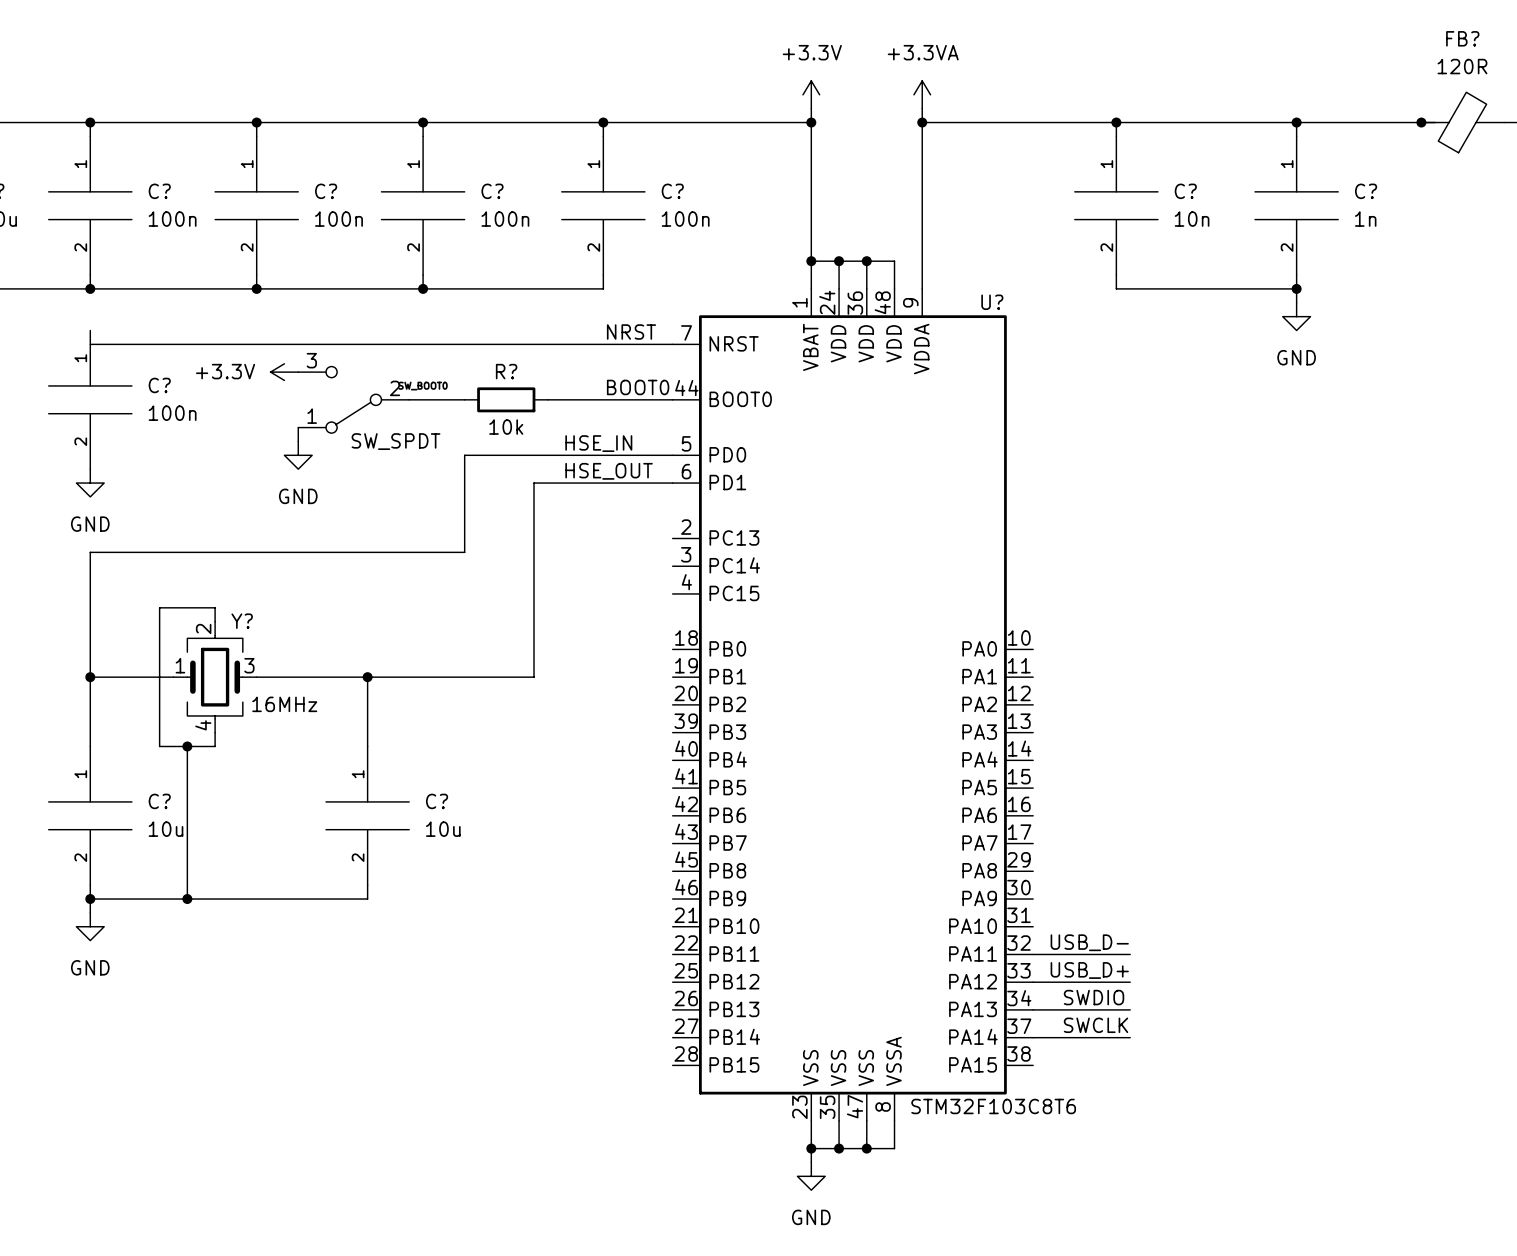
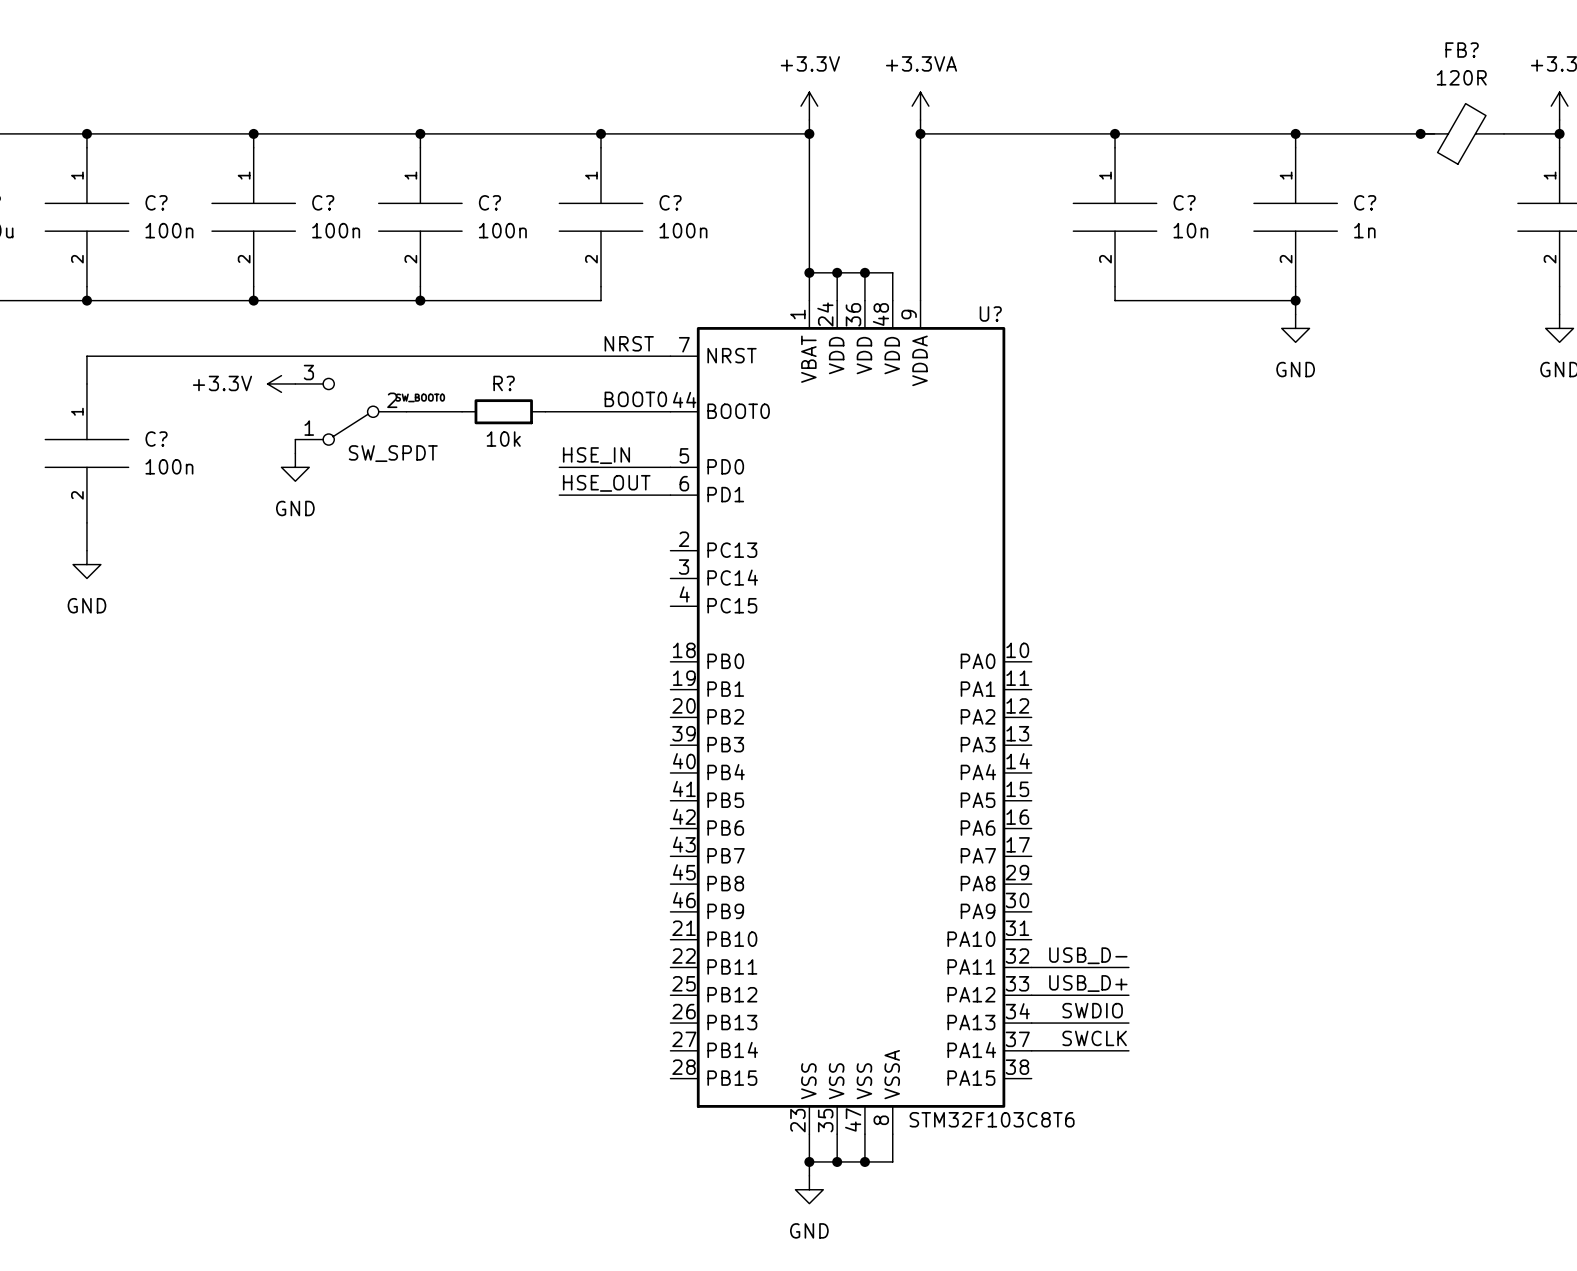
C? position: (90, 399) -> (86, 453)
wire: (561, 455) (464, 455) (464, 552) (90, 552) (90, 746) -> none
power symbol position: GND (90, 483) -> GND (86, 564)
wire: (561, 483) (534, 483) (534, 677) (256, 677) -> none
wire: none -> (86, 522) (86, 550)
wire: (215, 621) (215, 607) (159, 607) (159, 746) (215, 746) (215, 732) -> none
wire: (90, 677) (173, 677) -> none
junction: (90, 677) -> none
Y?: 16MHz (215, 677) -> none
wire: (367, 677) (367, 746) -> none
junction: (367, 677) -> none
wire: (187, 746) (187, 899) -> none
junction: (187, 746) -> none
C?: 10u (90, 815) -> none
C?: 10u (367, 815) -> none
wire: (90, 885) (90, 912) -> none
wire: (367, 885) (367, 899) (90, 899) -> none
junction: (90, 899) -> none
junction: (187, 899) -> none
power symbol: GND (90, 926) -> none

